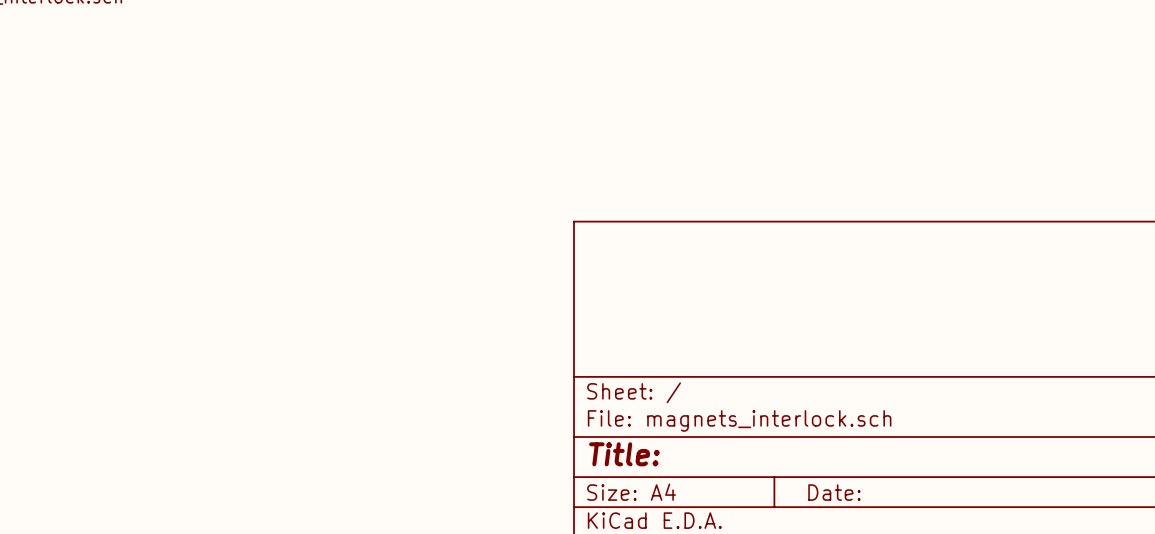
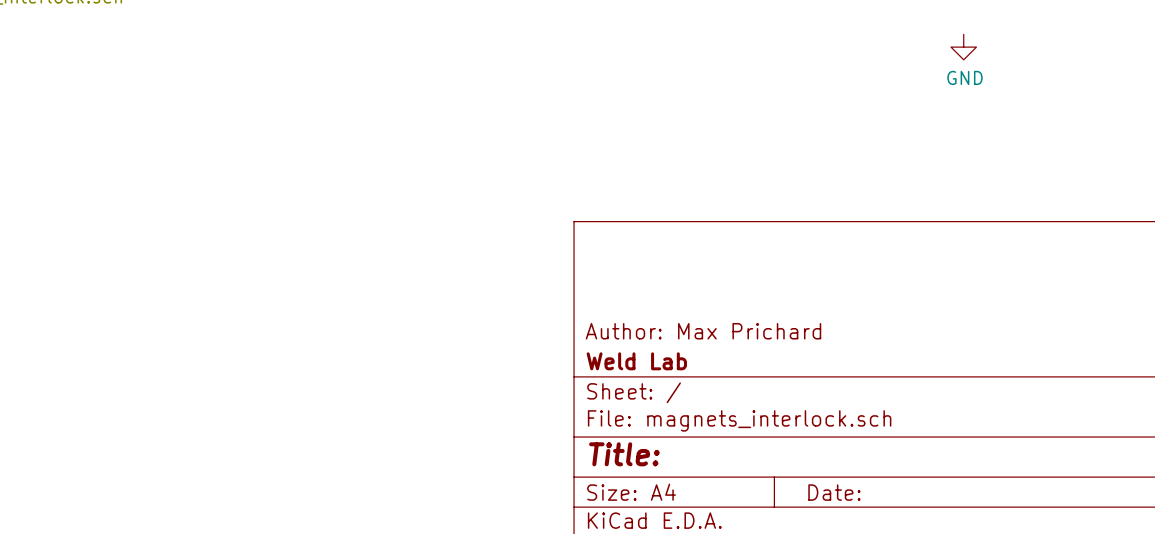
power symbol: none -> GND (963, 47)
title block: none -> Author: Max Prichard (703, 331)
title block: none -> Weld Lab (636, 361)

